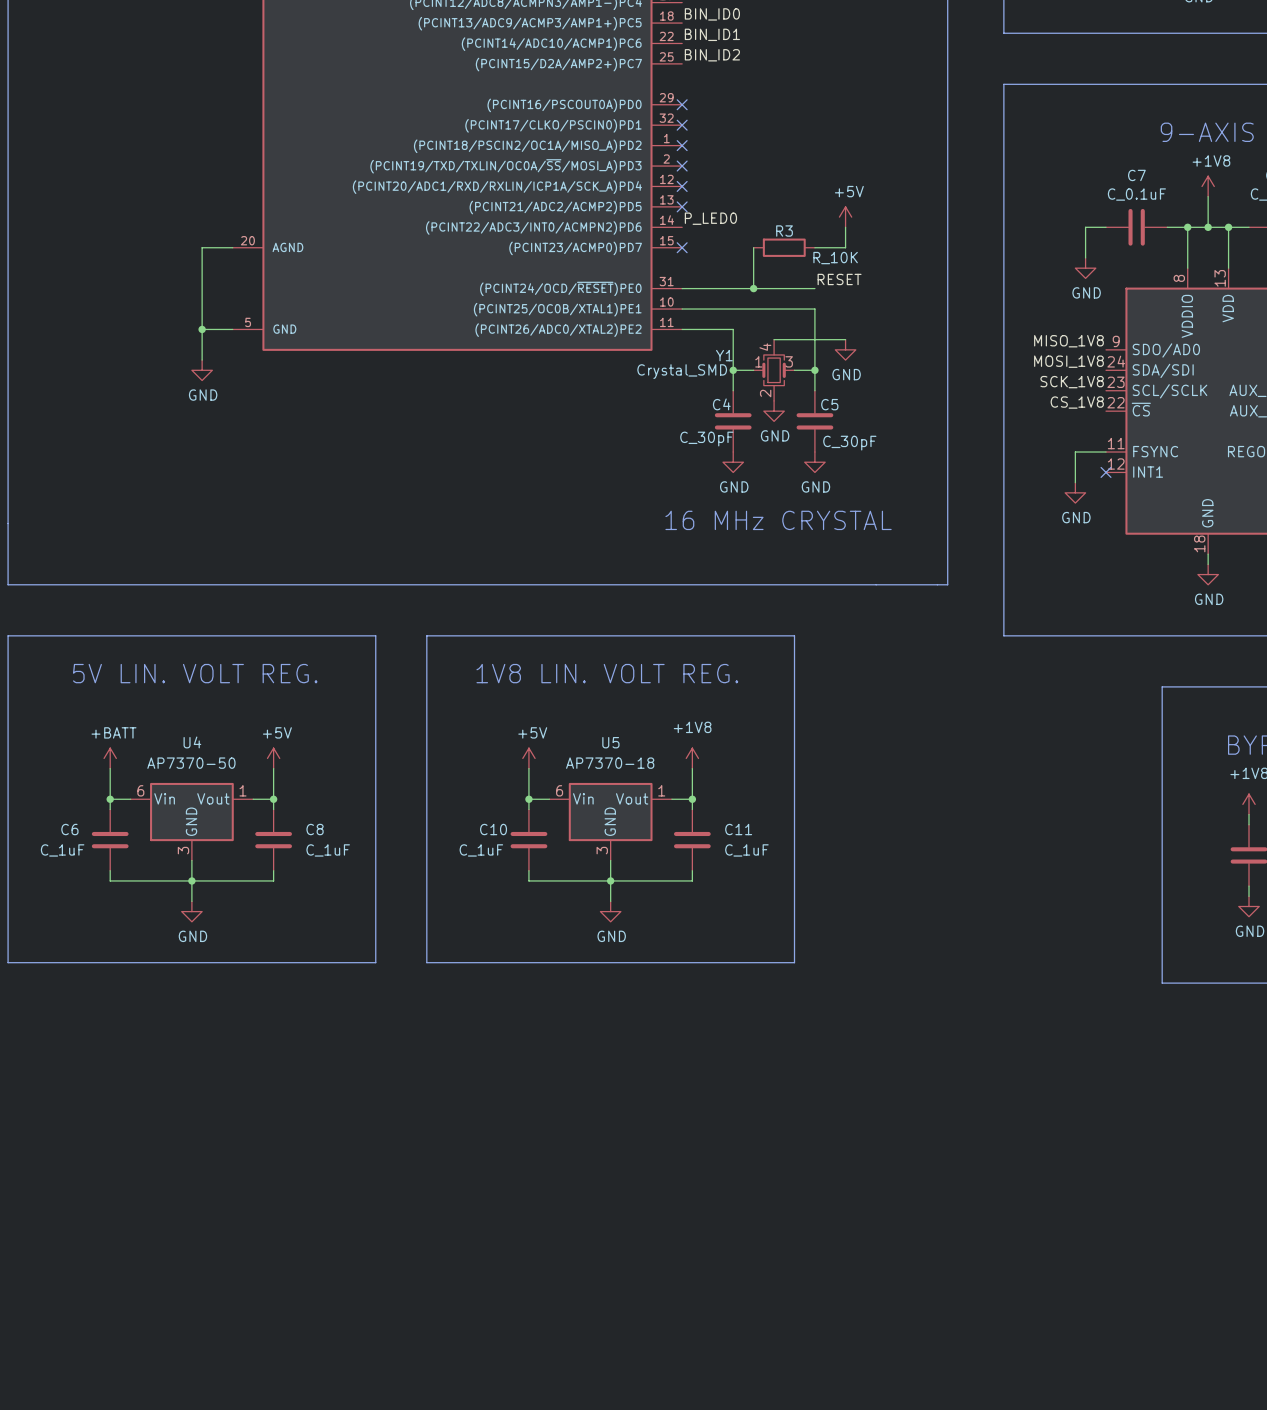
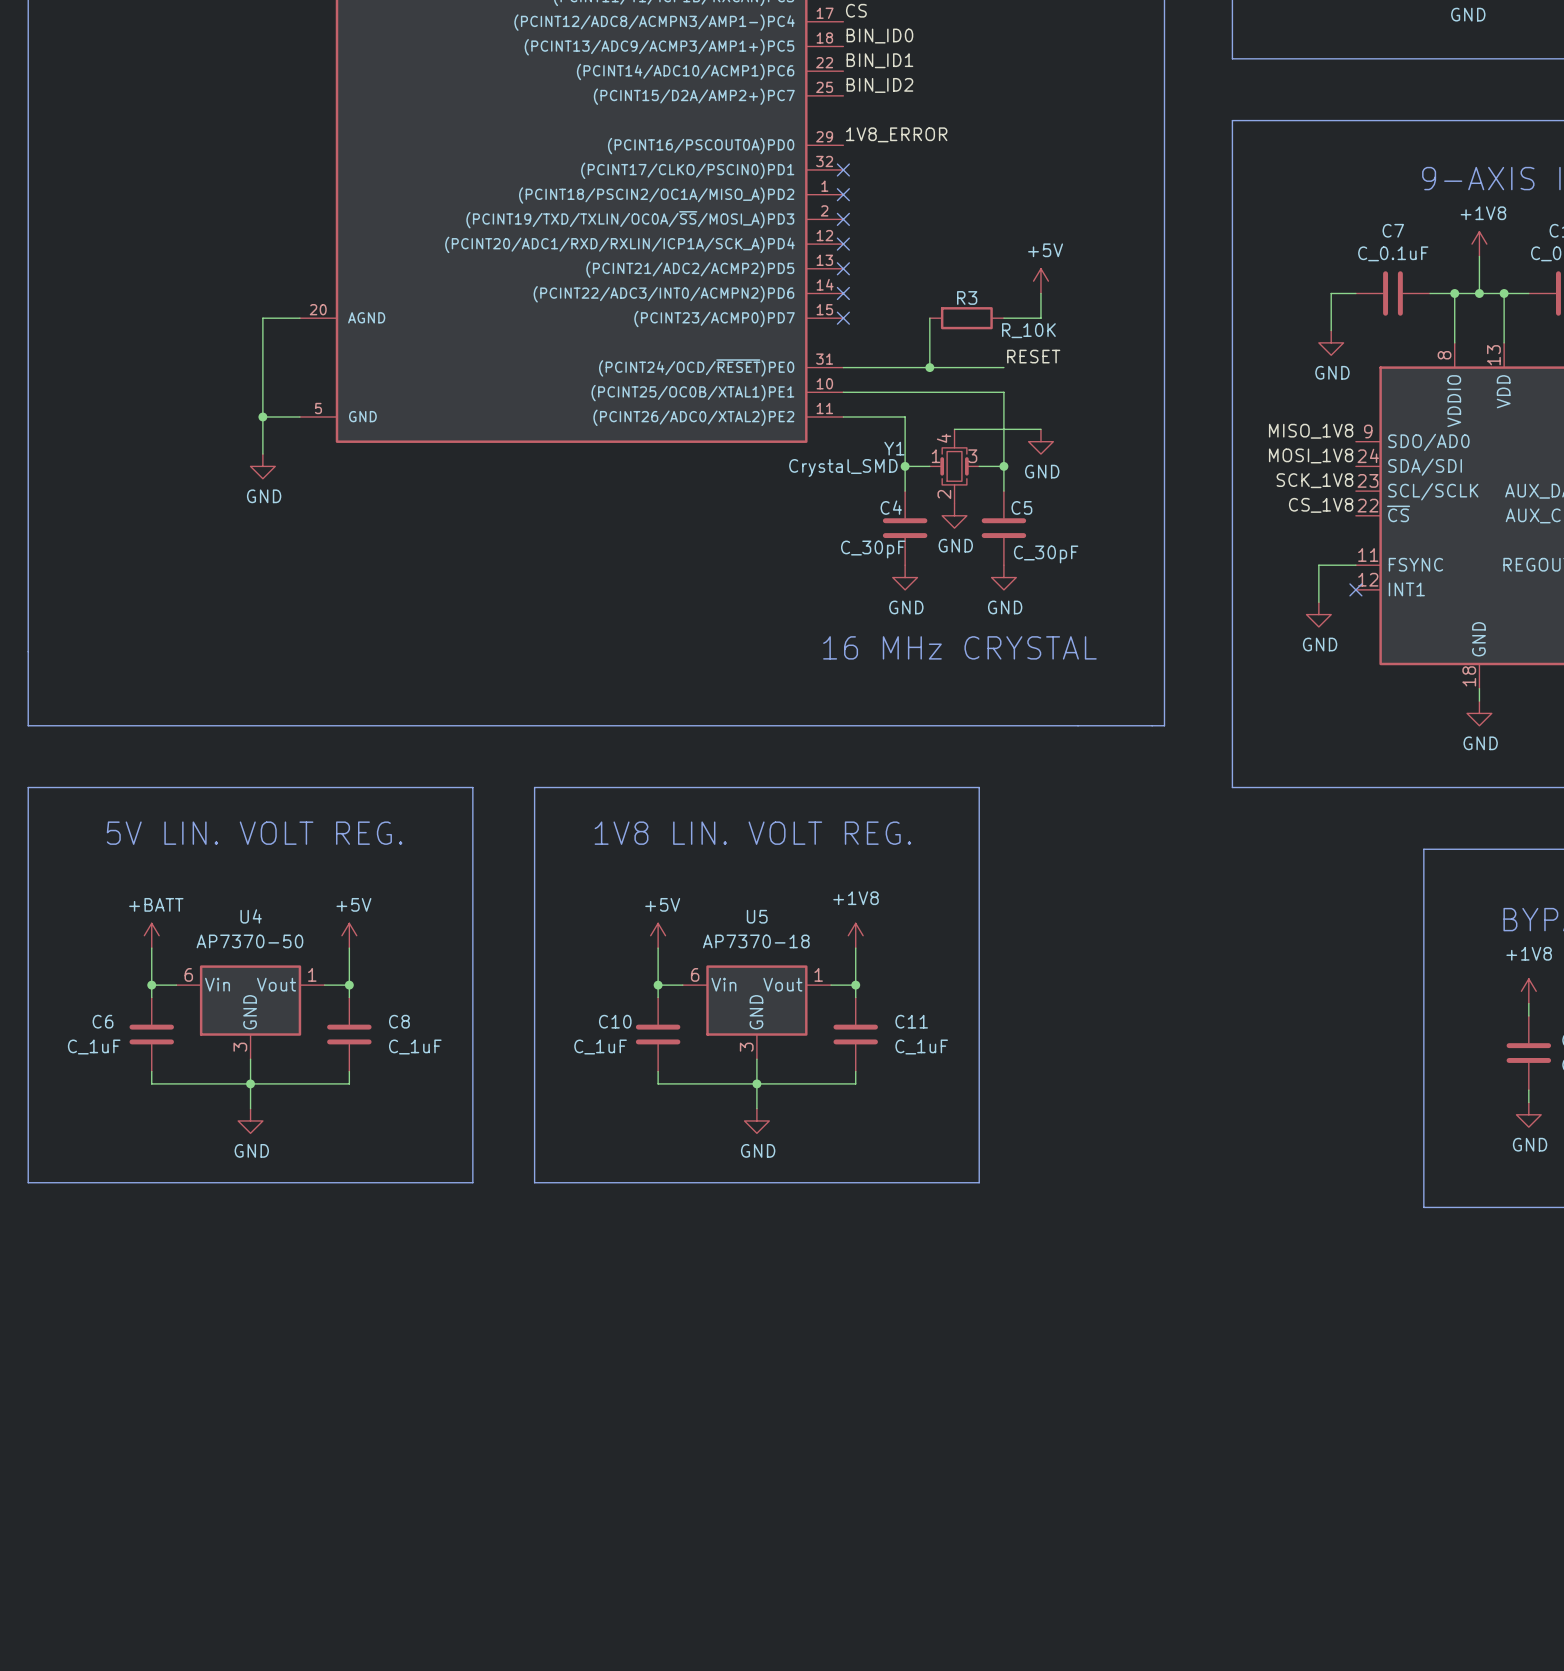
label: none -> 1V8_ERROR (896, 134)
no-connect mark: (682, 104) -> none
label: P_LED0 (710, 218) -> none
no-connect mark: none -> (843, 293)

